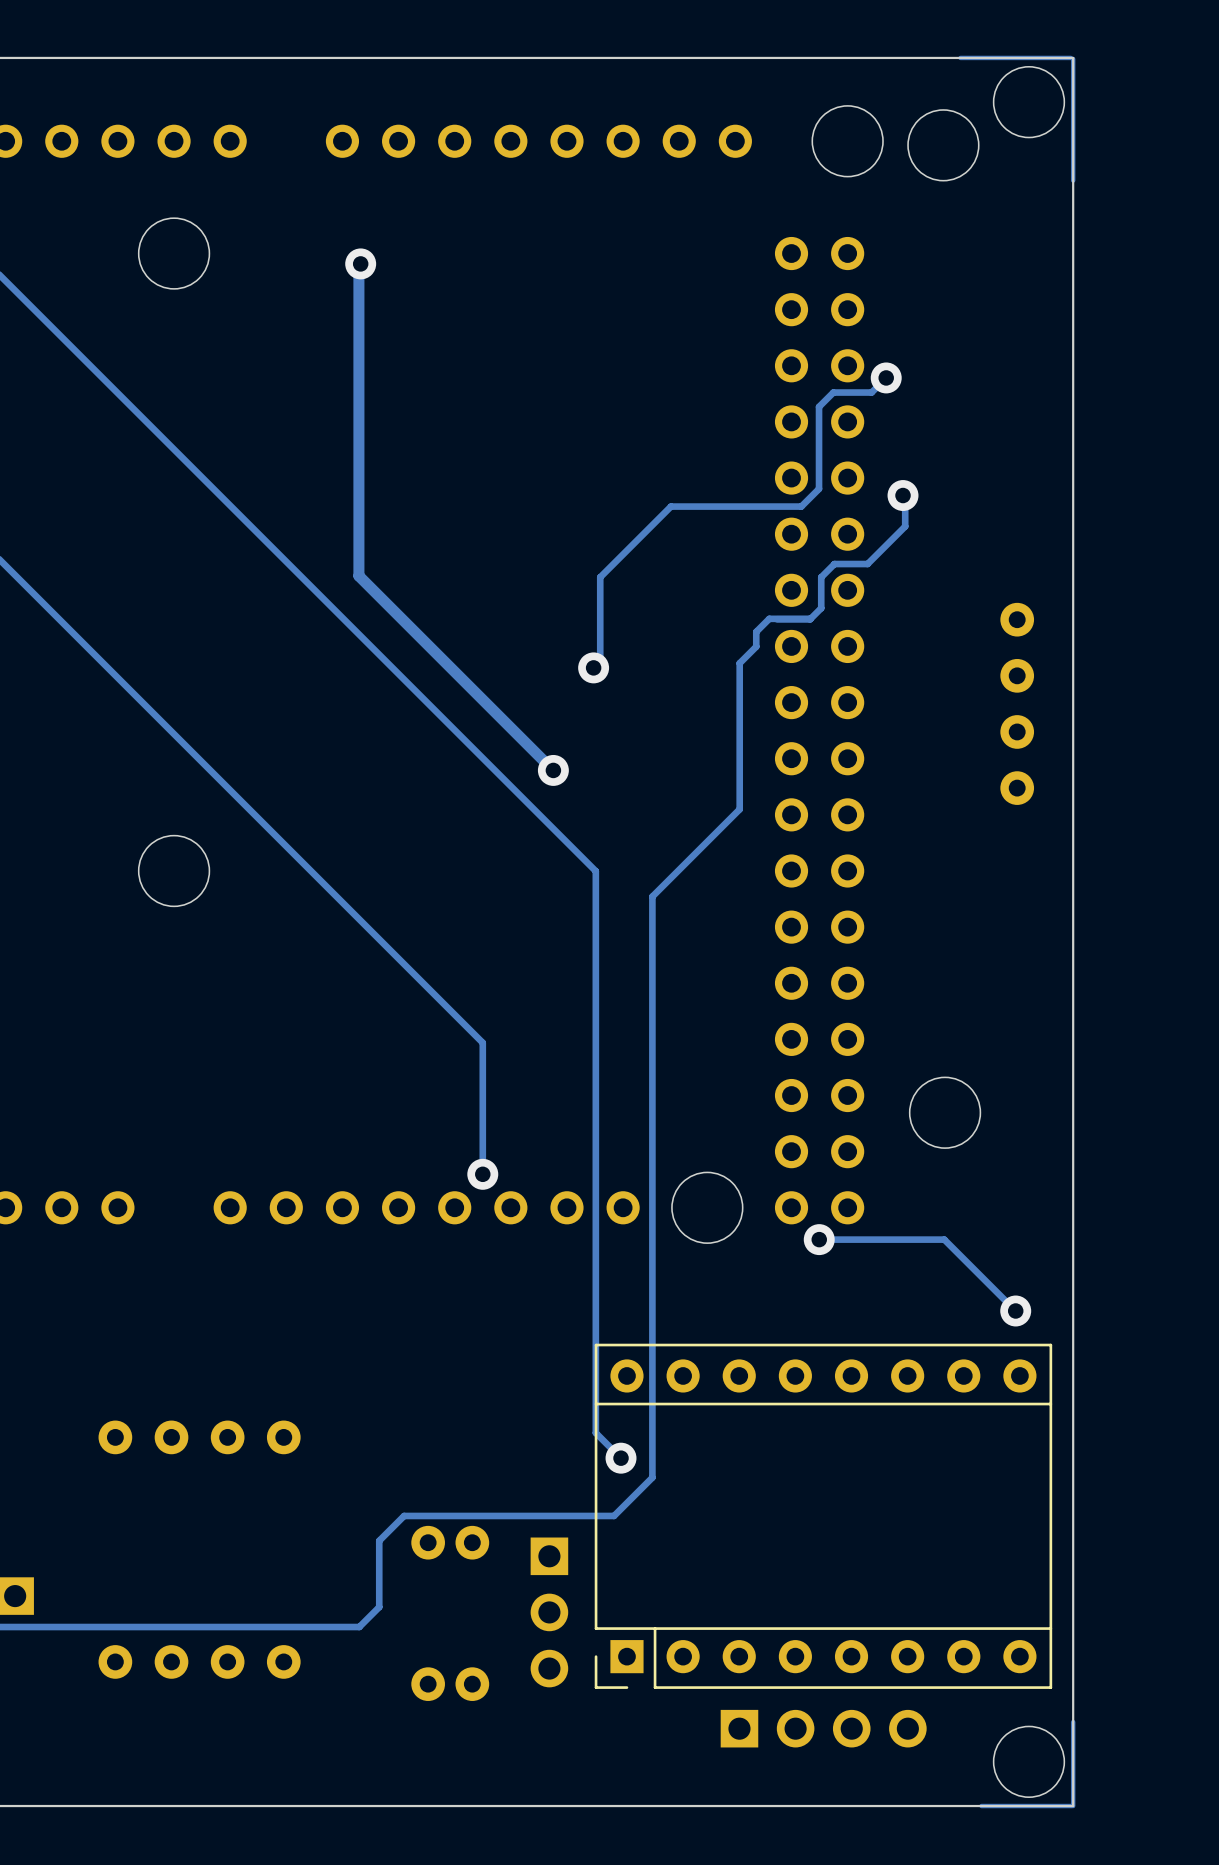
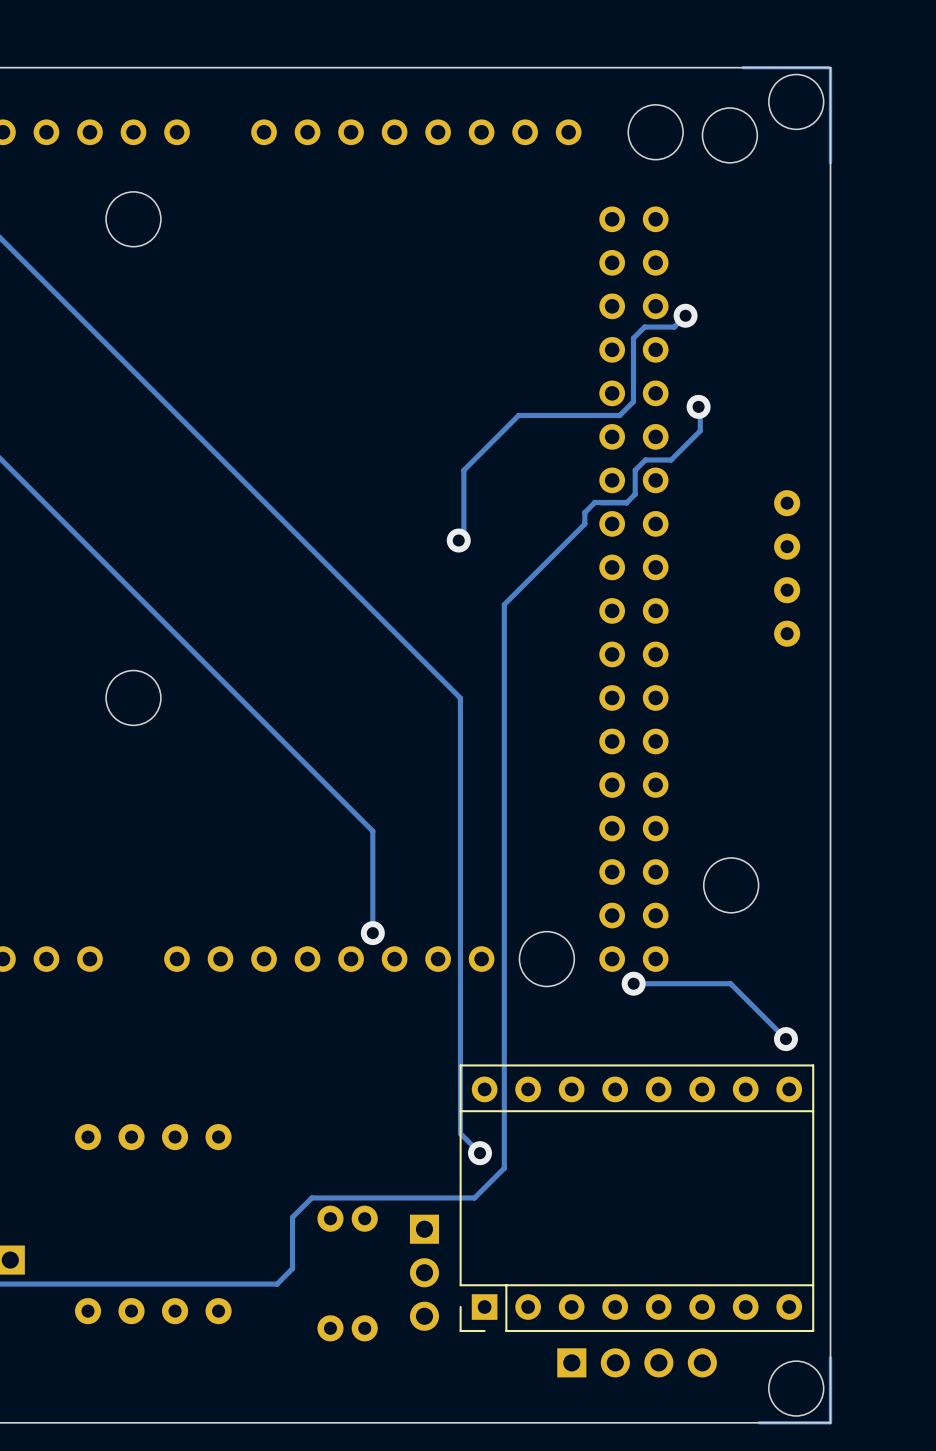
via: (360, 263) -> none
track: (358, 270) (358, 575) (553, 770) -> none
track: (739, 663) (739, 809) (652, 896) -> (571, 536) (504, 604) (504, 717)
via: (553, 770) -> none

